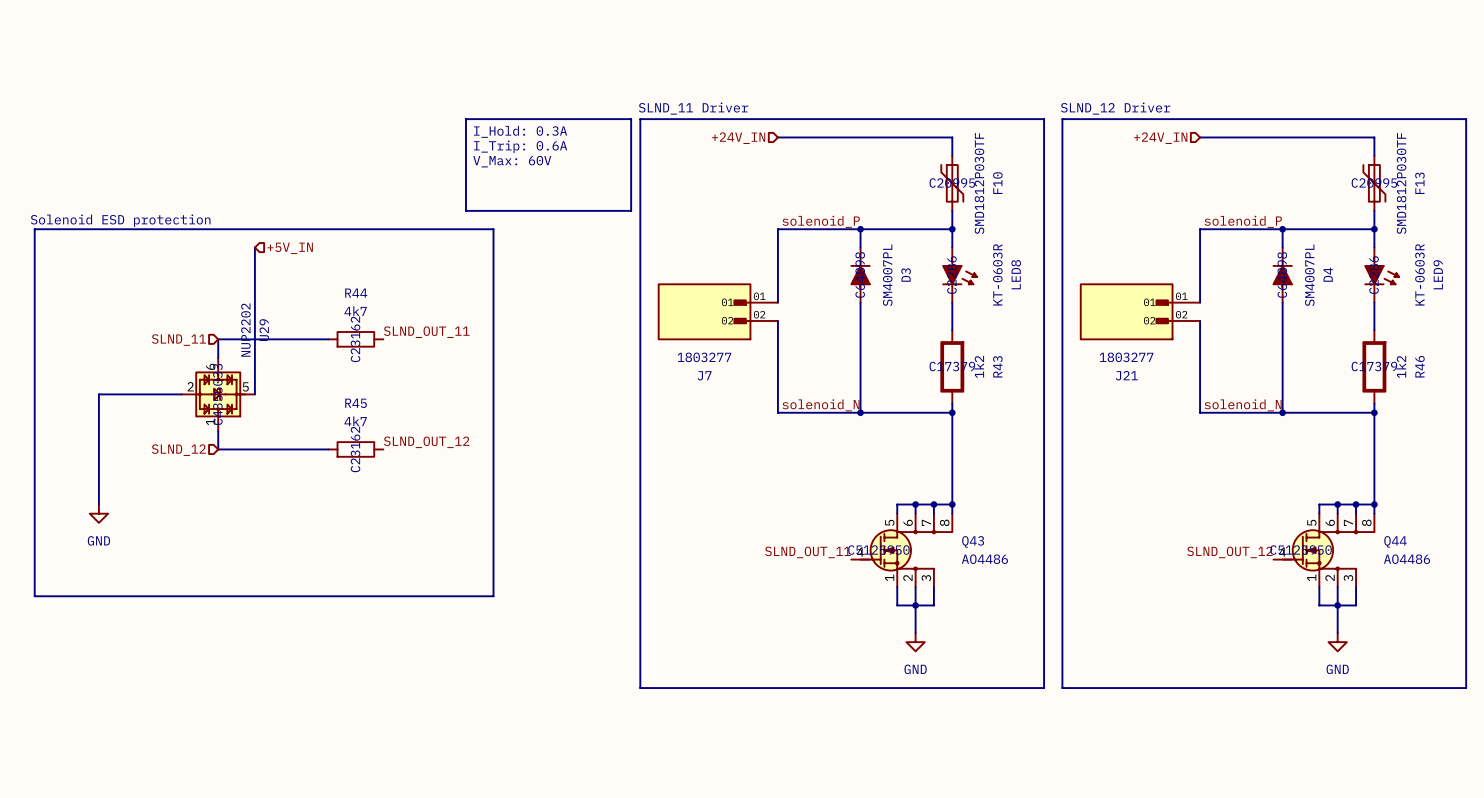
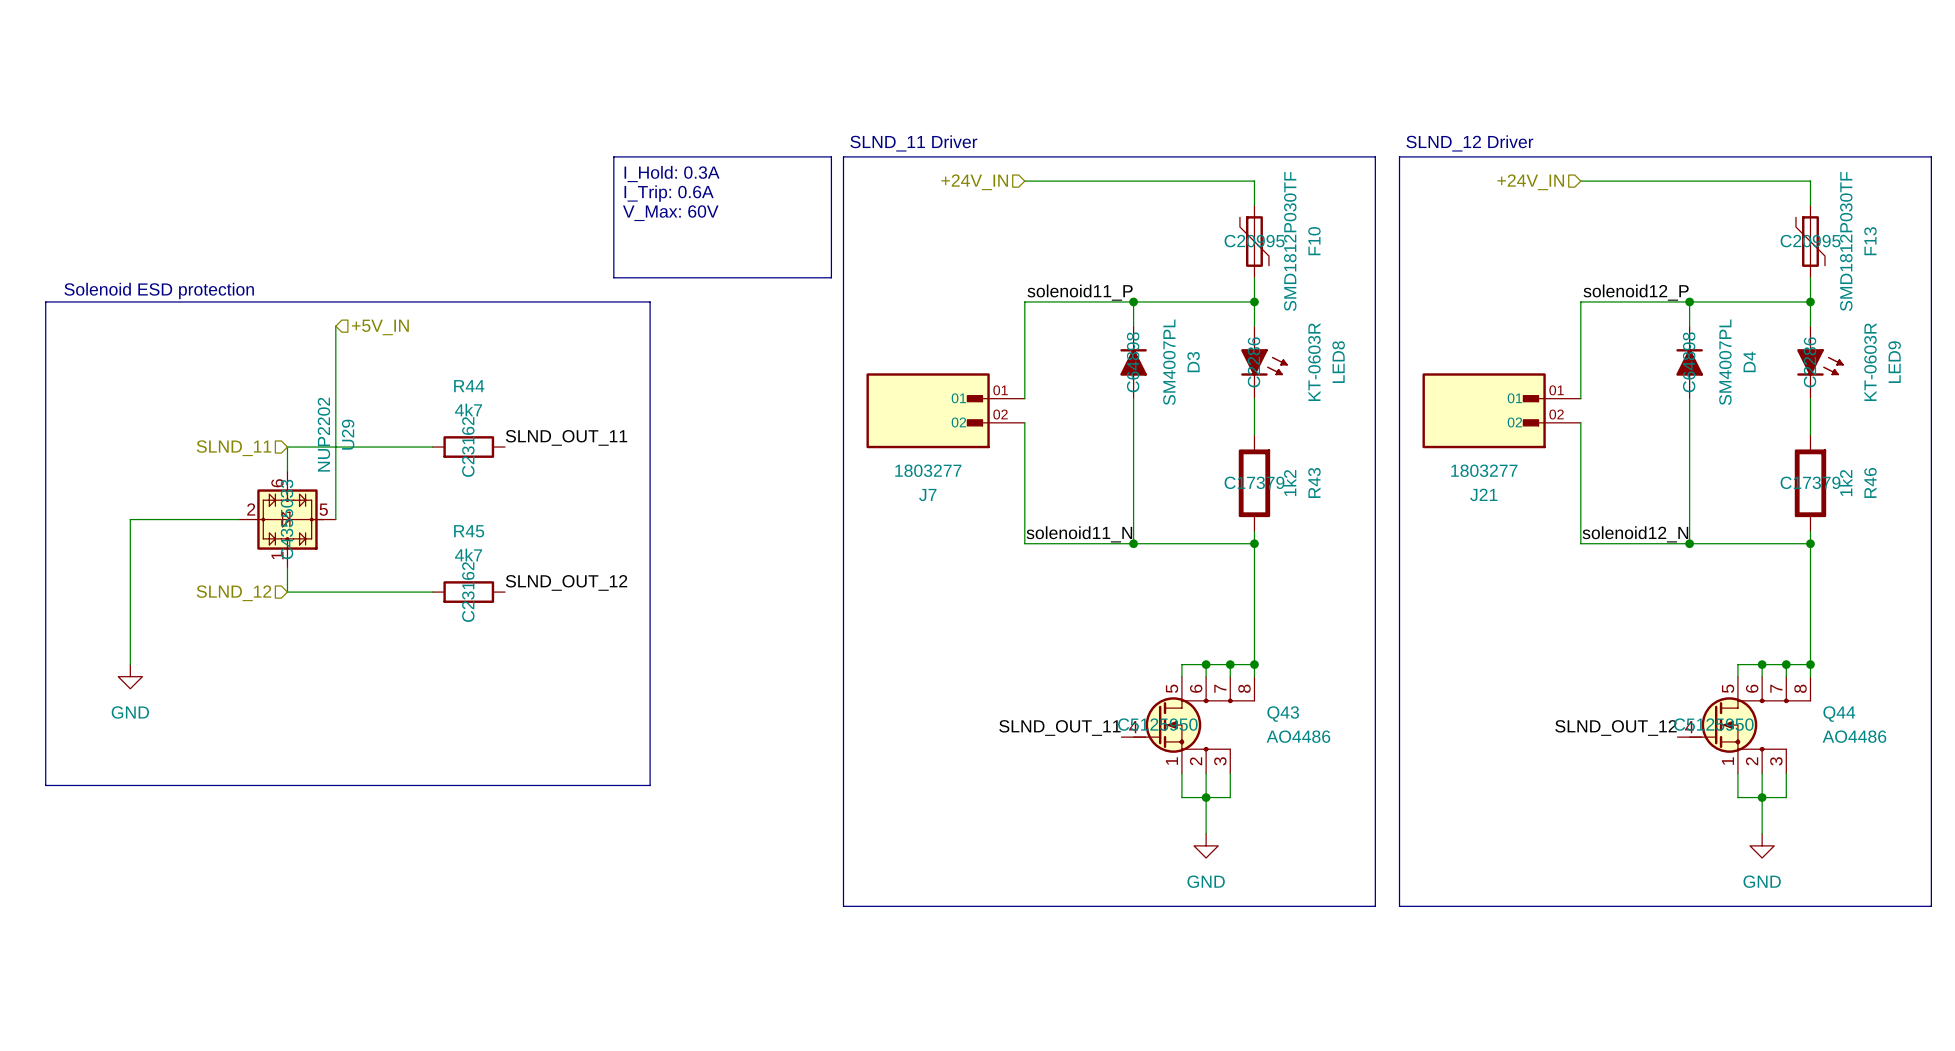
label: solenoid_P (821, 221) -> solenoid11_P (1080, 292)
label: solenoid_P (1243, 221) -> solenoid12_P (1636, 292)
label: solenoid_N (821, 405) -> solenoid11_N (1079, 534)
label: solenoid_N (1243, 405) -> solenoid12_N (1635, 534)

